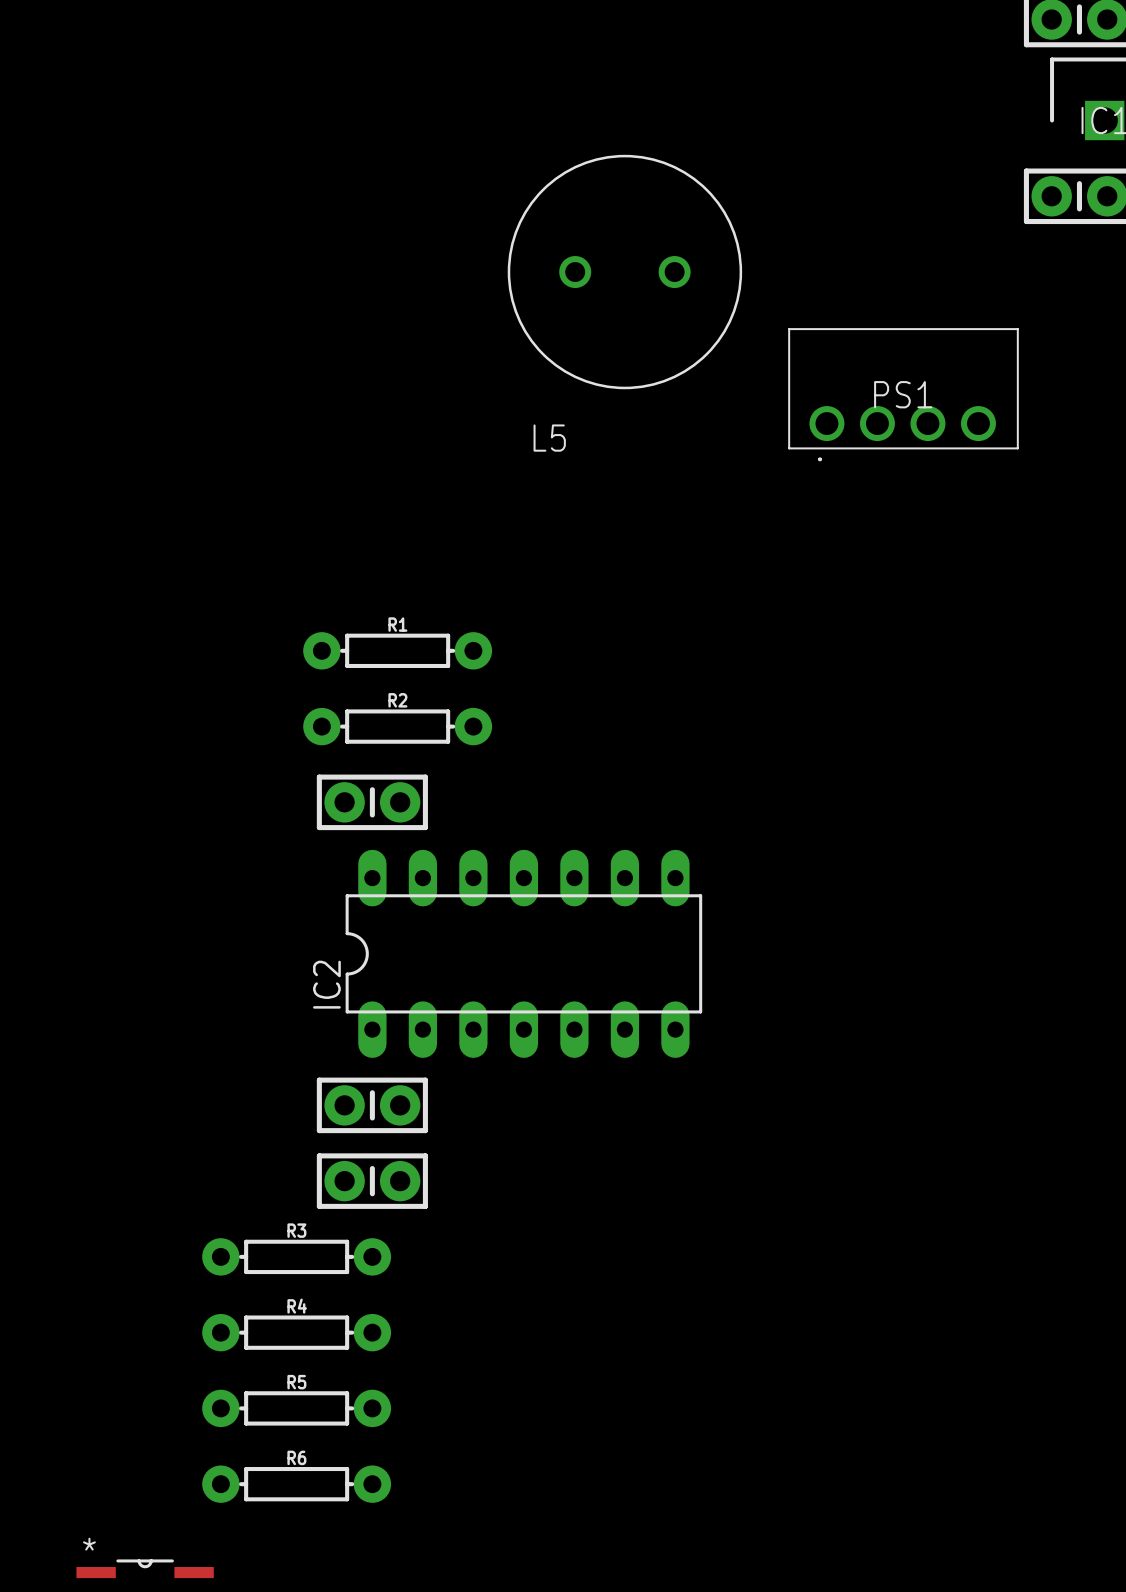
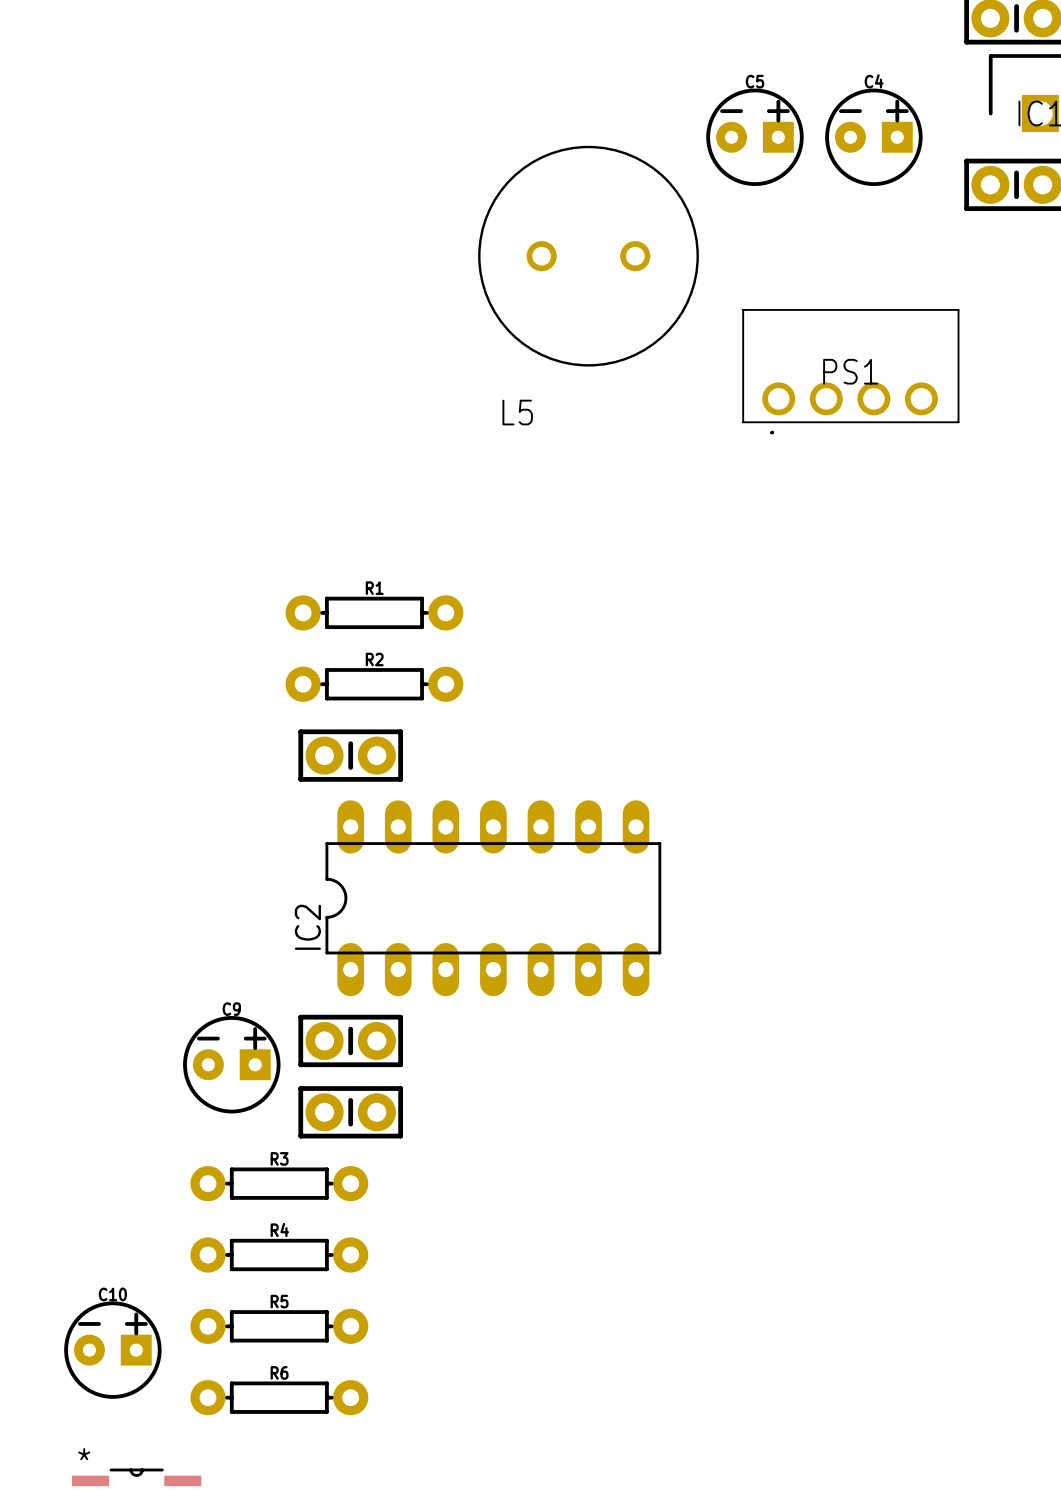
C5: none -> (754, 137)
C4: none -> (873, 137)
C9: none -> (231, 1064)
C10: none -> (112, 1350)

